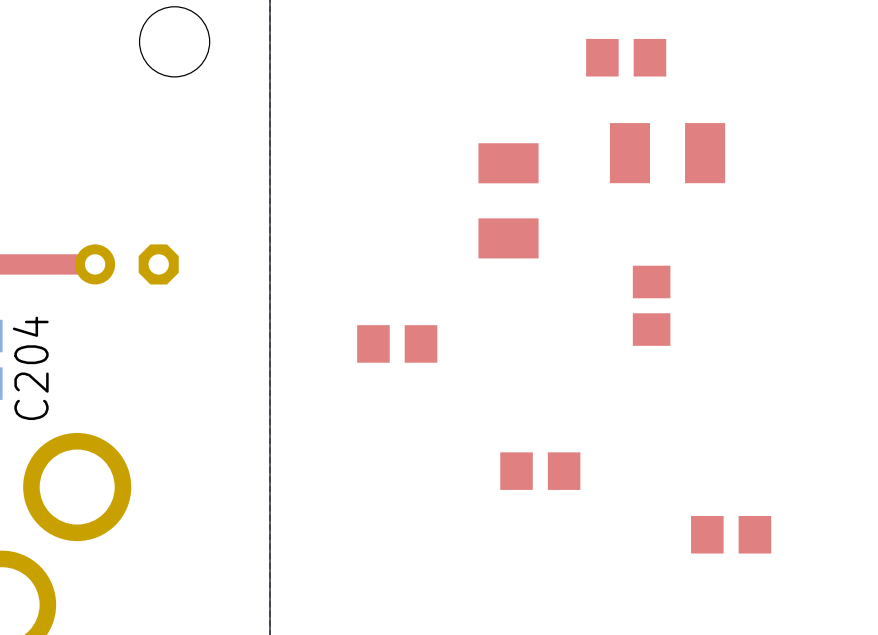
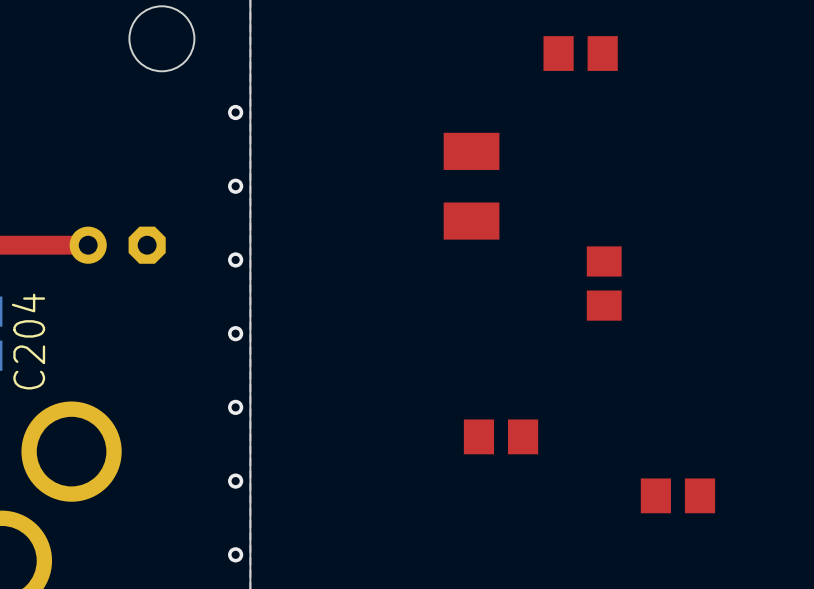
via: none -> (235, 112)
part: (667, 153) -> none
via: none -> (235, 186)
via: none -> (235, 259)
part: (397, 343) -> none
via: none -> (235, 333)
via: none -> (235, 407)
via: none -> (235, 481)
via: none -> (235, 554)

